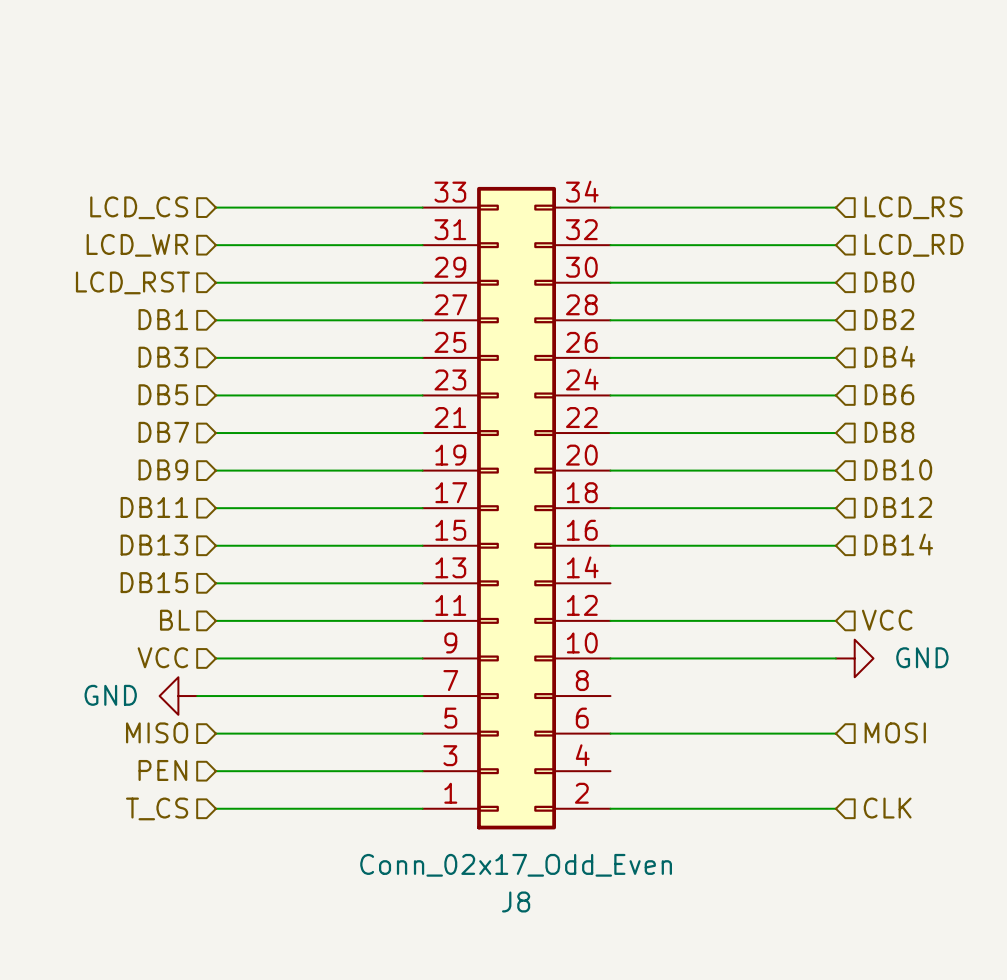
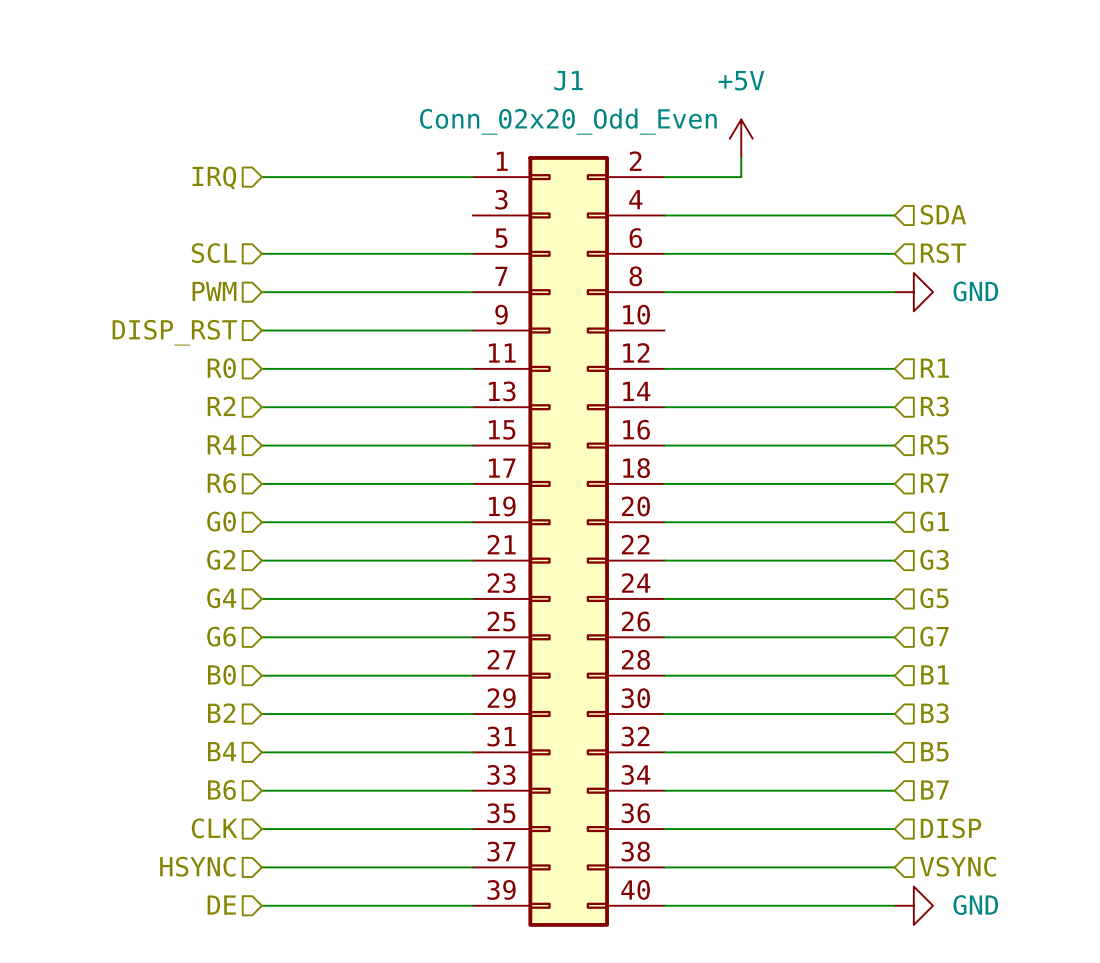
power symbol: none -> +5V (741, 138)
wire: none -> (741, 157) (741, 177) (664, 177)
hierarchical label: none -> IRQ (214, 177)
hierarchical label: LCD_CS (139, 207) -> none
wire: (215, 207) (422, 207) -> (261, 177) (472, 177)
hierarchical label: LCD_RS (913, 207) -> SDA (943, 214)
hierarchical label: LCD_WR (137, 245) -> SCL (214, 253)
hierarchical label: LCD_RD (914, 245) -> RST (943, 253)
hierarchical label: LCD_RST (132, 282) -> PWM (214, 291)
power symbol: none -> GND (913, 292)
hierarchical label: DB0 (889, 282) -> none
hierarchical label: DB1 (163, 319) -> DISP_RST (174, 332)
hierarchical label: DB2 (889, 319) -> none
wire: (610, 320) (835, 320) -> (664, 598) (894, 598)
hierarchical label: DB4 (889, 356) -> R1 (934, 368)
hierarchical label: DB3 (163, 357) -> R0 (221, 368)
hierarchical label: DB5 (163, 394) -> R2 (221, 406)
hierarchical label: DB6 (889, 394) -> R3 (934, 406)
hierarchical label: DB7 (163, 432) -> R4 (222, 444)
hierarchical label: DB8 (889, 432) -> R5 (934, 445)
hierarchical label: DB9 (163, 469) -> R6 (221, 483)
hierarchical label: DB10 (898, 469) -> R7 (934, 483)
hierarchical label: DB11 (154, 507) -> G0 (221, 521)
hierarchical label: DB12 (898, 507) -> G1 (934, 521)
J8: Conn_02x17_Odd_Even (516, 508) -> none
J1: none -> Conn_02x20_Odd_Even (568, 541)
hierarchical label: DB14 (898, 544) -> G3 (934, 559)
hierarchical label: DB13 (154, 545) -> G2 (221, 559)
hierarchical label: DB15 (154, 582) -> G4 (221, 598)
hierarchical label: none -> G5 (934, 598)
hierarchical label: BL (174, 620) -> G6 (221, 636)
hierarchical label: VCC (887, 620) -> G7 (934, 636)
hierarchical label: VCC (162, 657) -> B0 (221, 674)
hierarchical label: none -> B1 (935, 674)
power symbol: GND (854, 658) -> none
hierarchical label: none -> B2 (221, 713)
hierarchical label: none -> B3 (934, 713)
power symbol: GND (178, 696) -> none
wire: (197, 696) (215, 696) -> none
wire: none -> (664, 714) (894, 714)
hierarchical label: MISO (157, 732) -> B4 (222, 751)
hierarchical label: MOSI (895, 732) -> B5 (934, 751)
hierarchical label: PEN (162, 770) -> B6 (221, 790)
hierarchical label: none -> B7 (934, 789)
wire: none -> (664, 790) (894, 790)
hierarchical label: T_CS (157, 808) -> CLK (214, 828)
hierarchical label: CLK (887, 808) -> DISP (950, 828)
hierarchical label: none -> HSYNC (197, 866)
hierarchical label: none -> VSYNC (957, 866)
wire: none -> (261, 867) (472, 867)
wire: none -> (664, 867) (894, 867)
hierarchical label: none -> DE (221, 905)
wire: none -> (261, 905) (472, 905)
wire: none -> (664, 905) (894, 905)
power symbol: none -> GND (913, 905)

